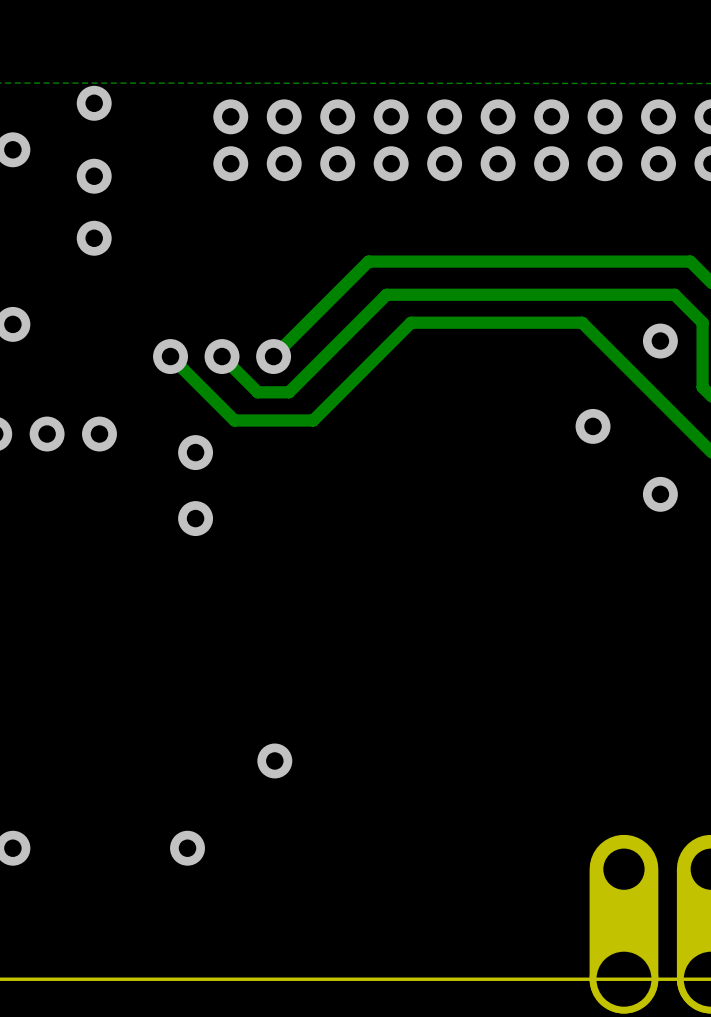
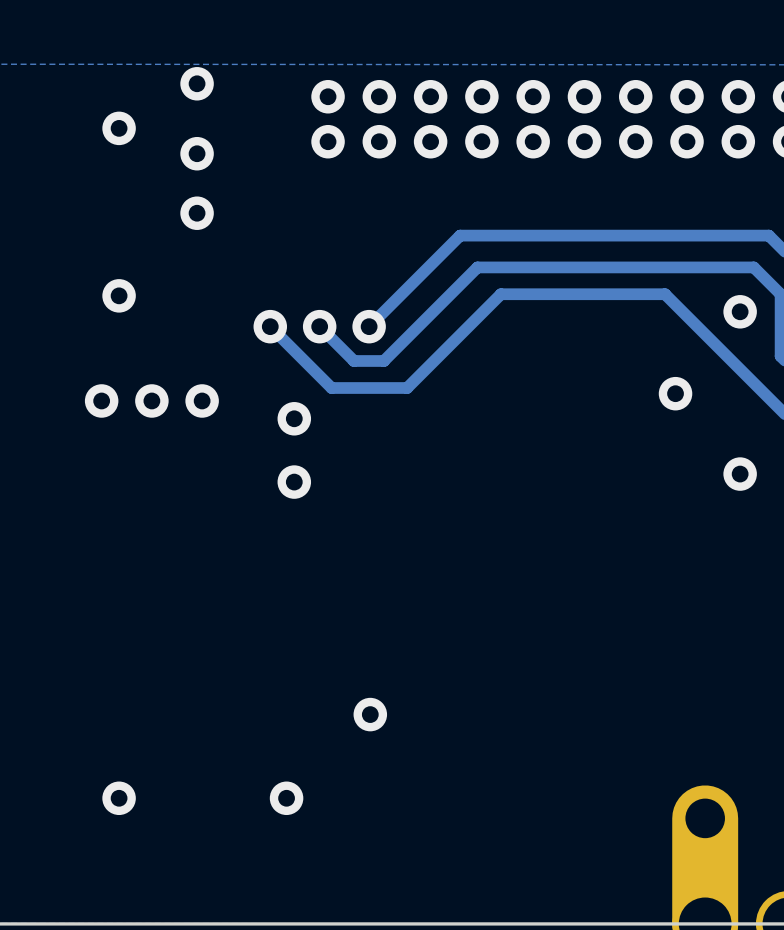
via position: (660, 494) -> (740, 474)

